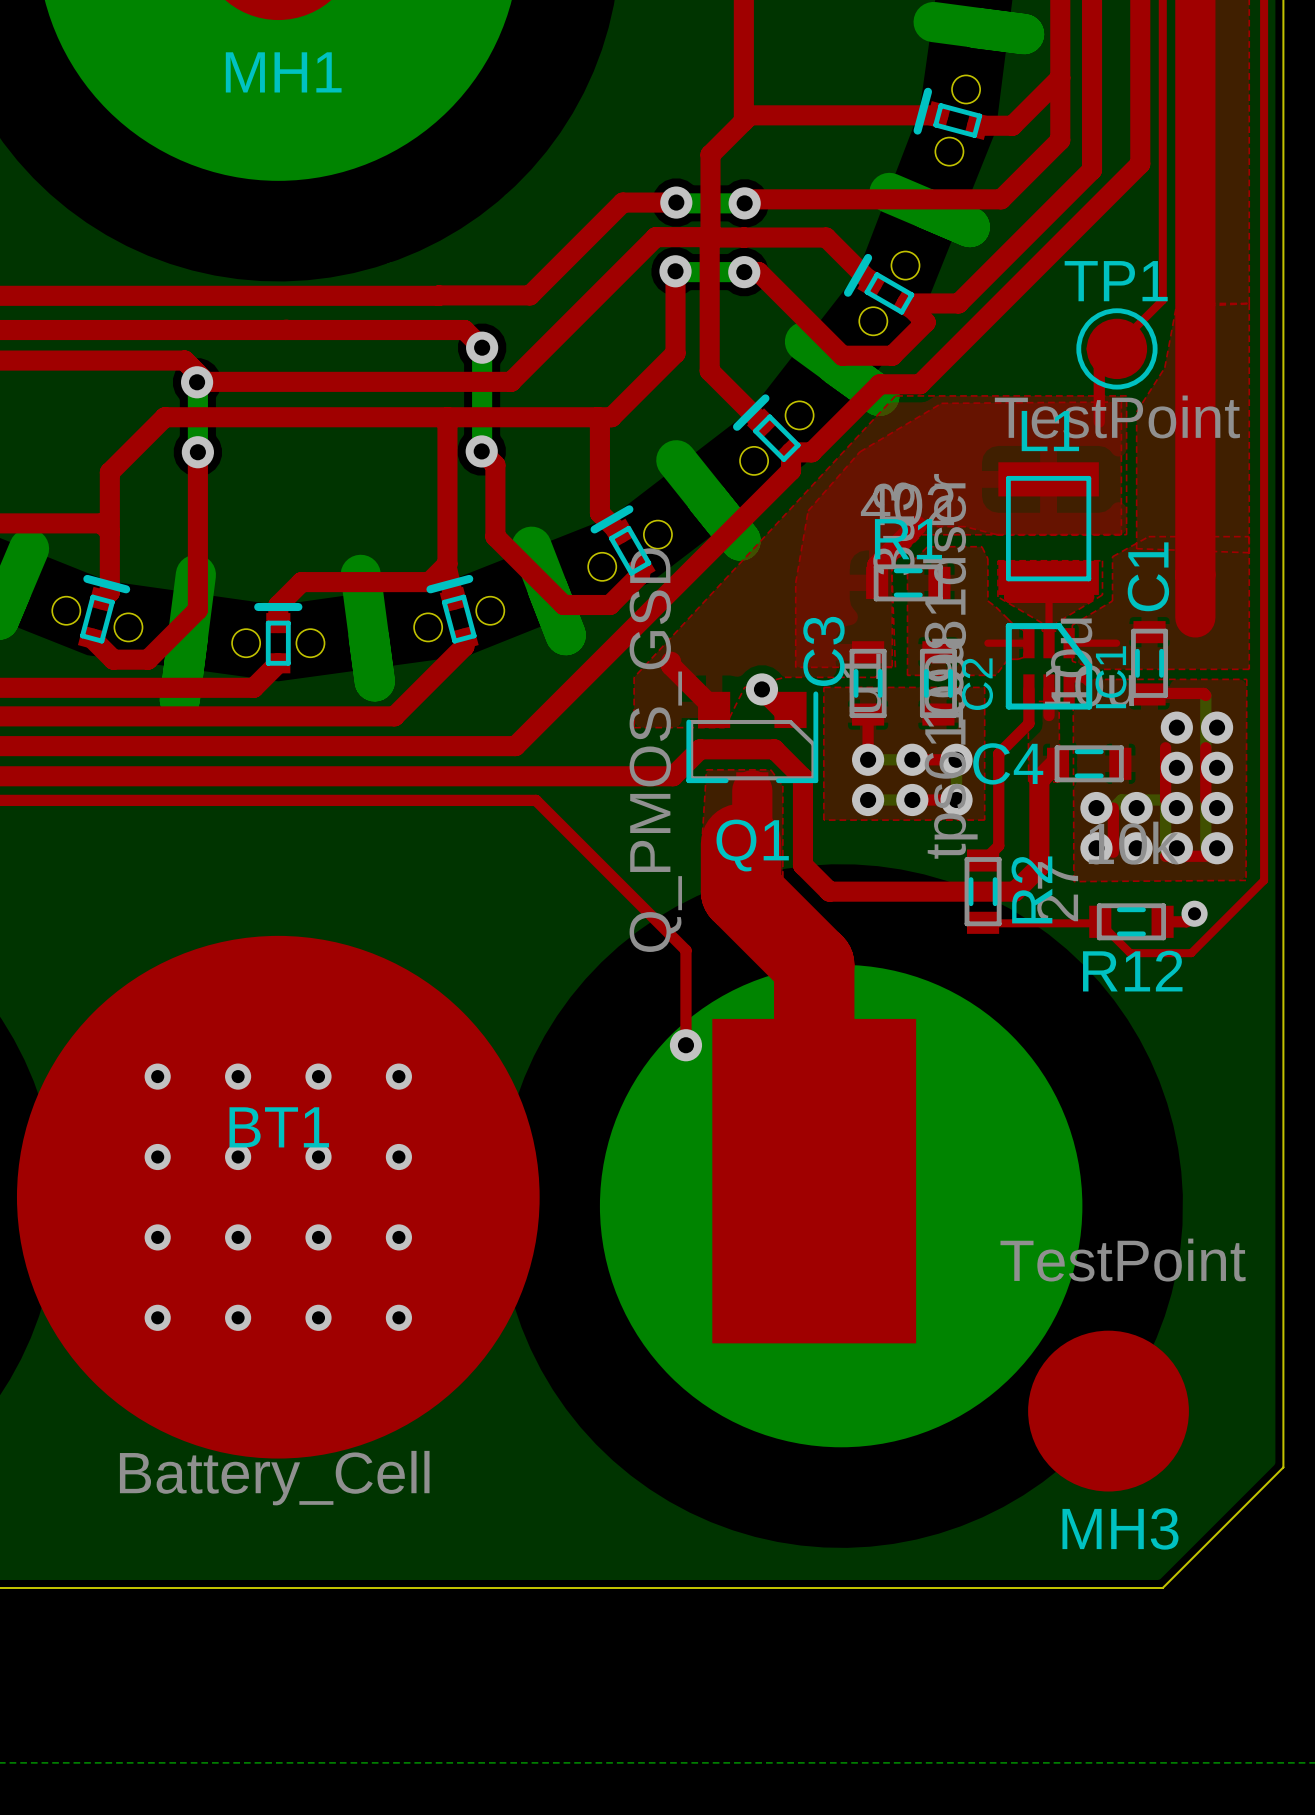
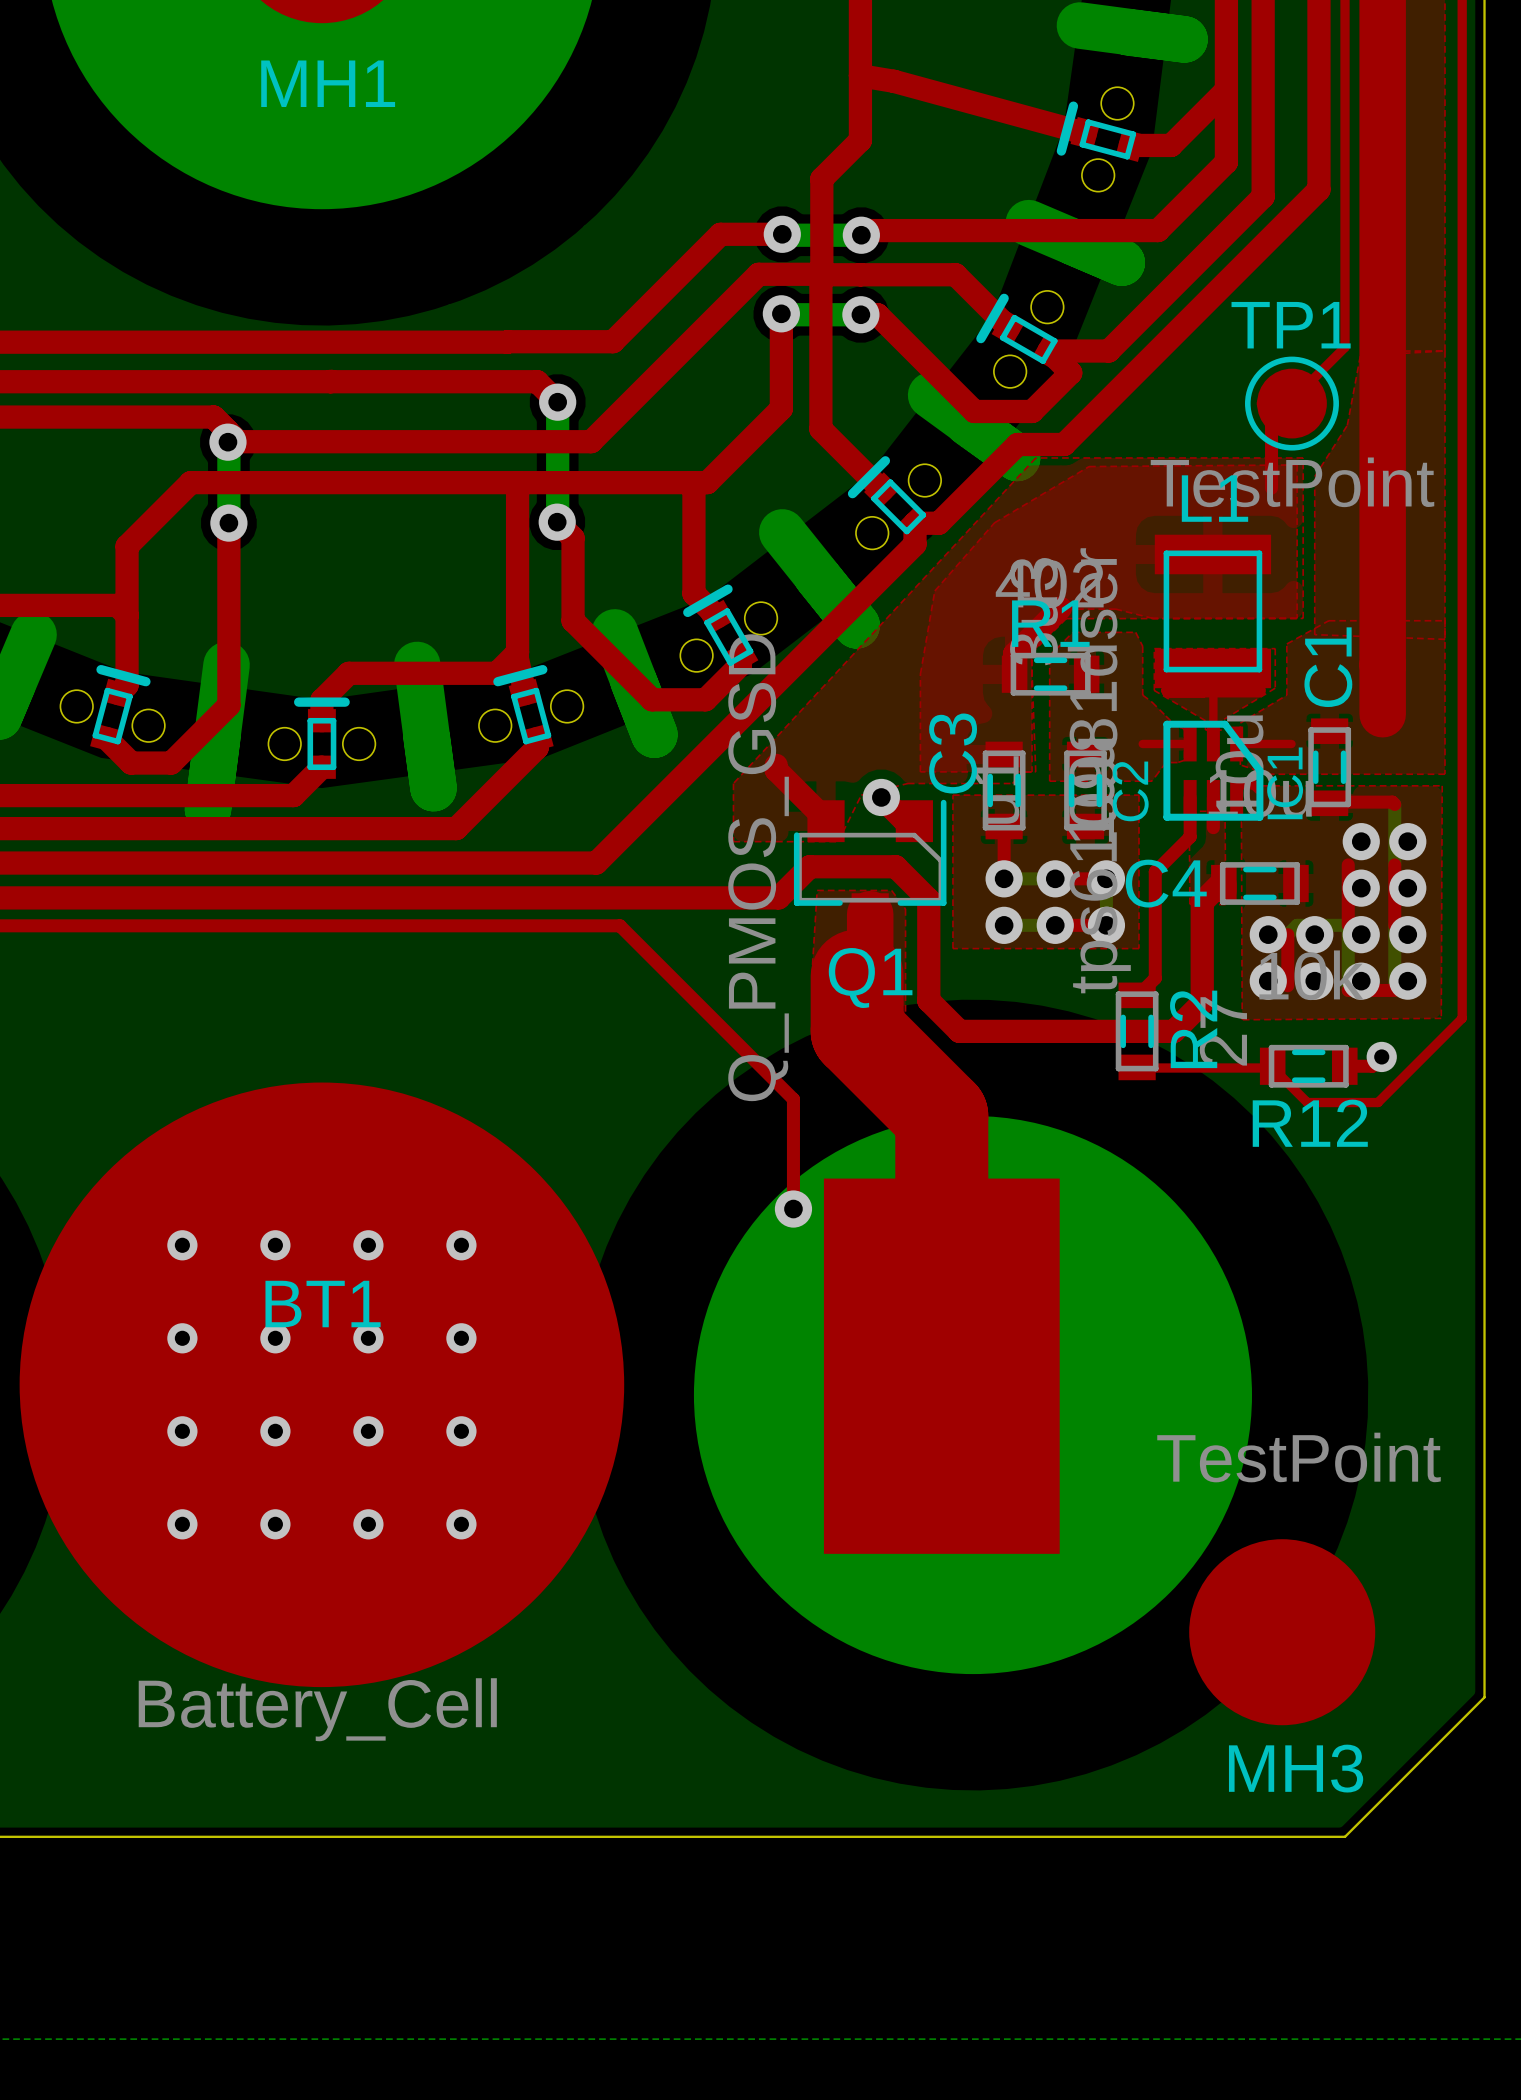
top track: (938, 115) (749, 115) (743, 121) -> (1085, 133) (893, 81) (860, 75)

